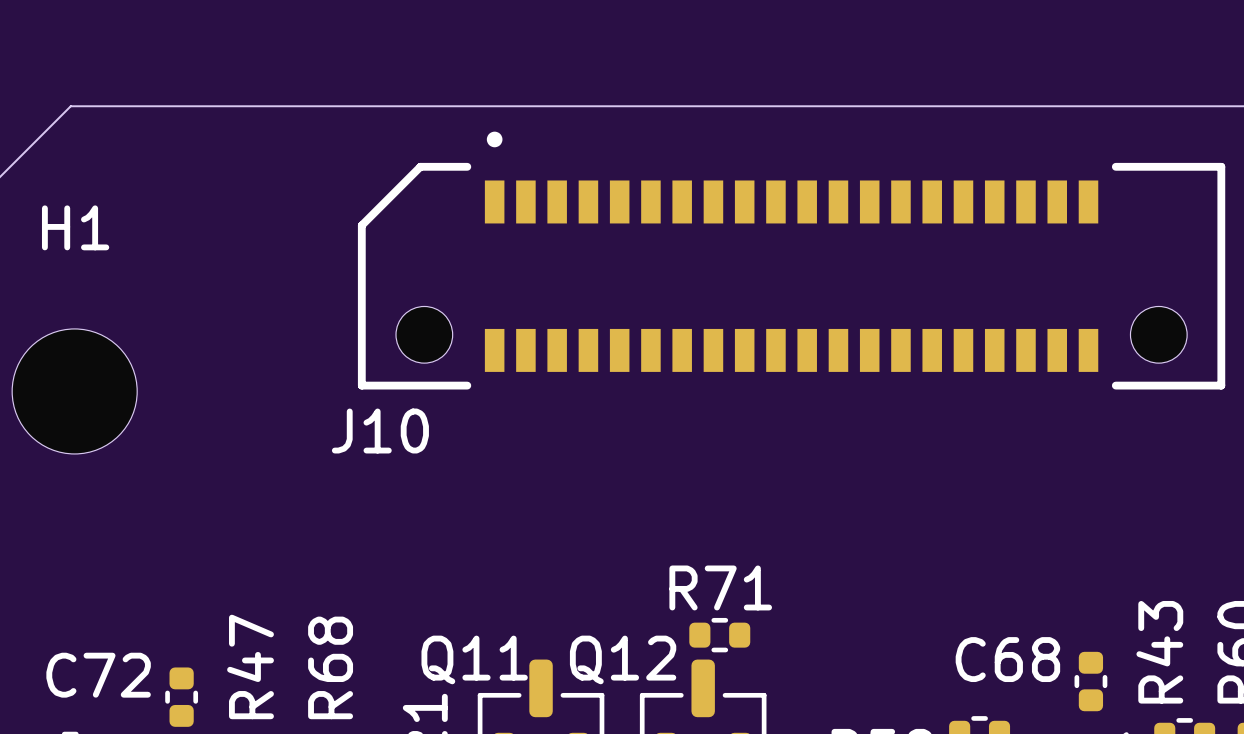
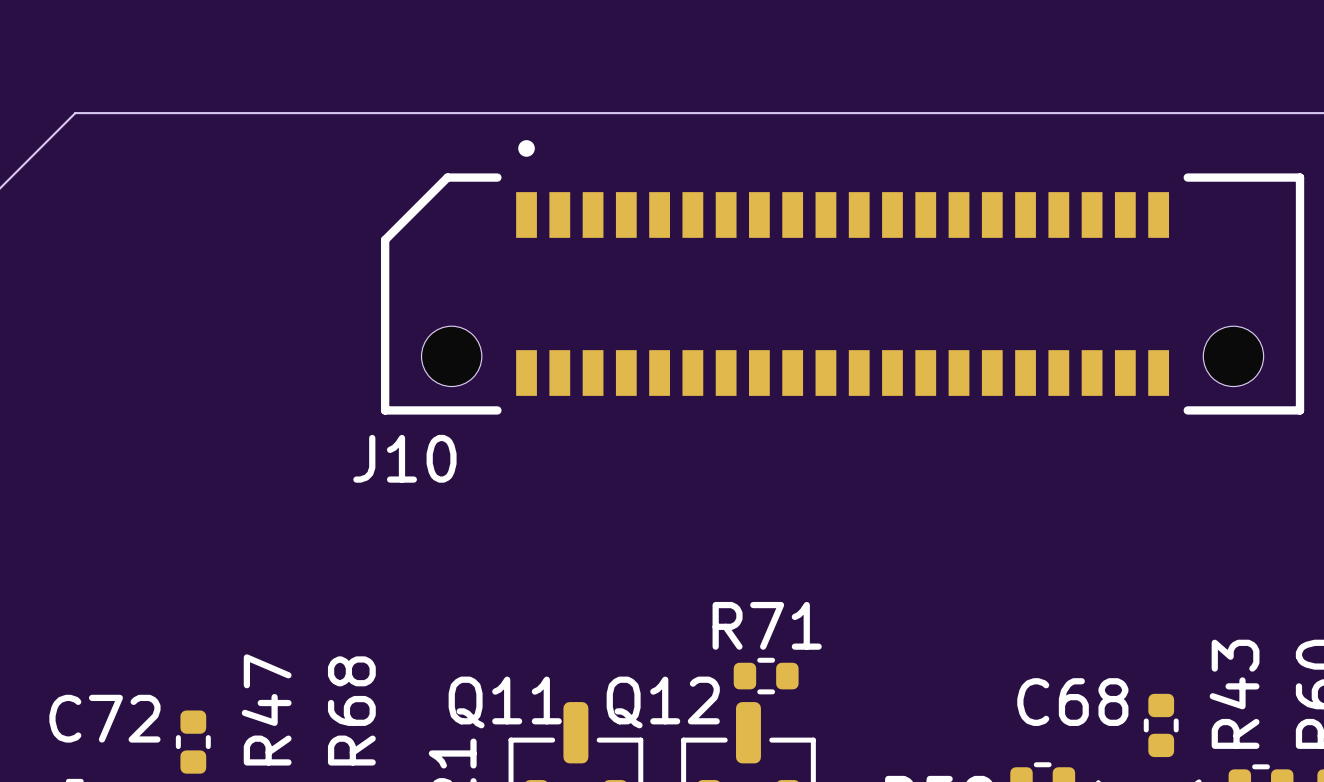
H1: (74, 391) -> none

